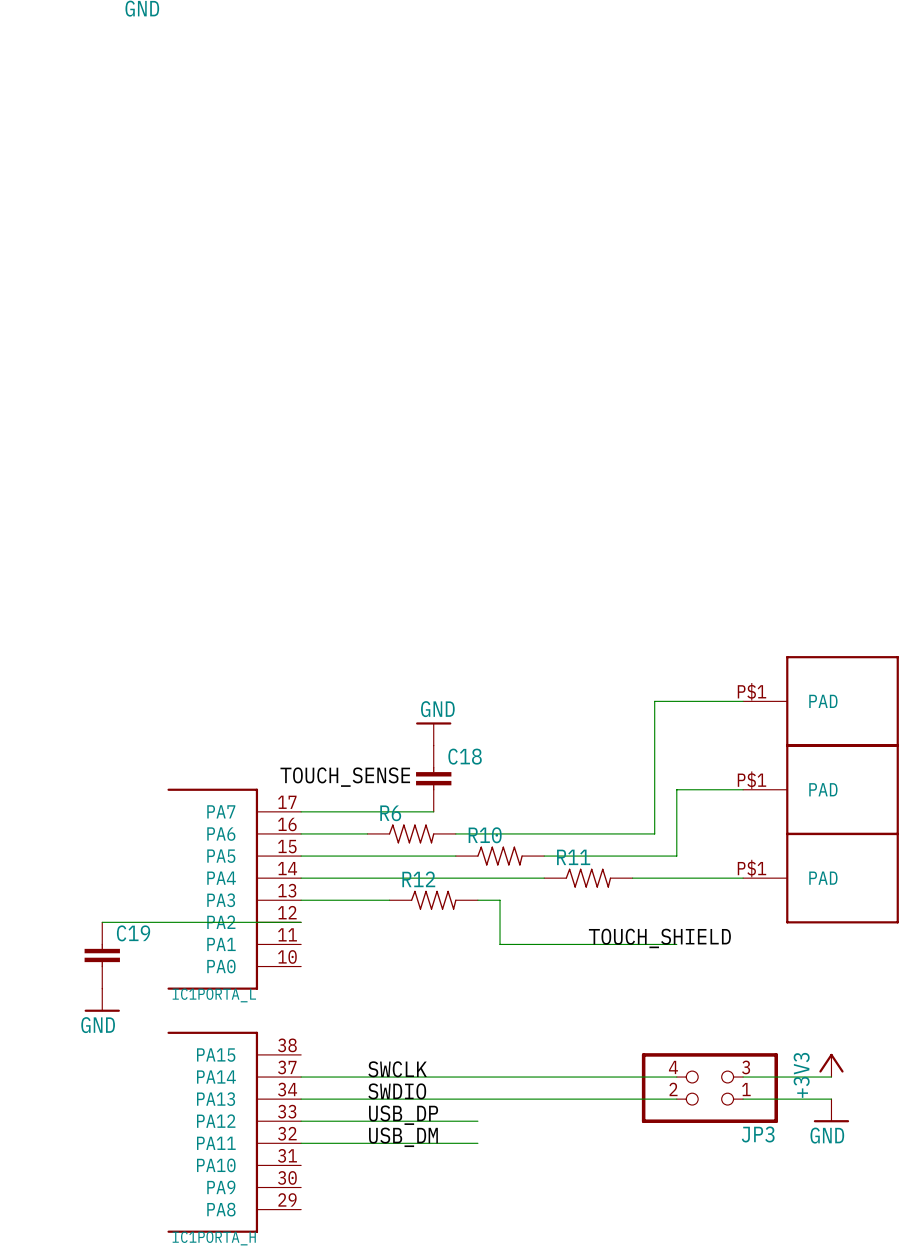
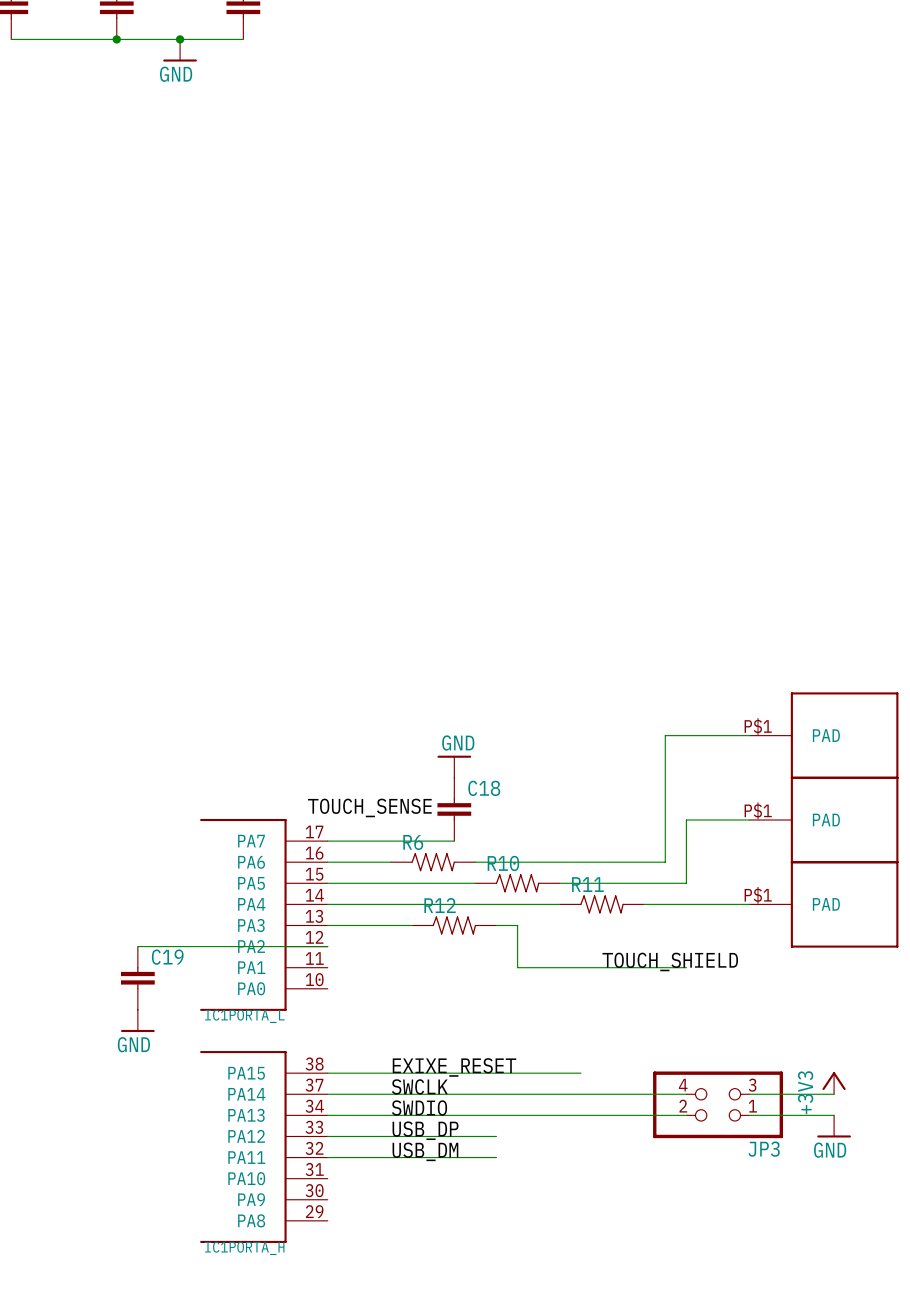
label: none -> EXIXE_RESET (454, 1067)
wire: none -> (327, 1073) (580, 1073)

